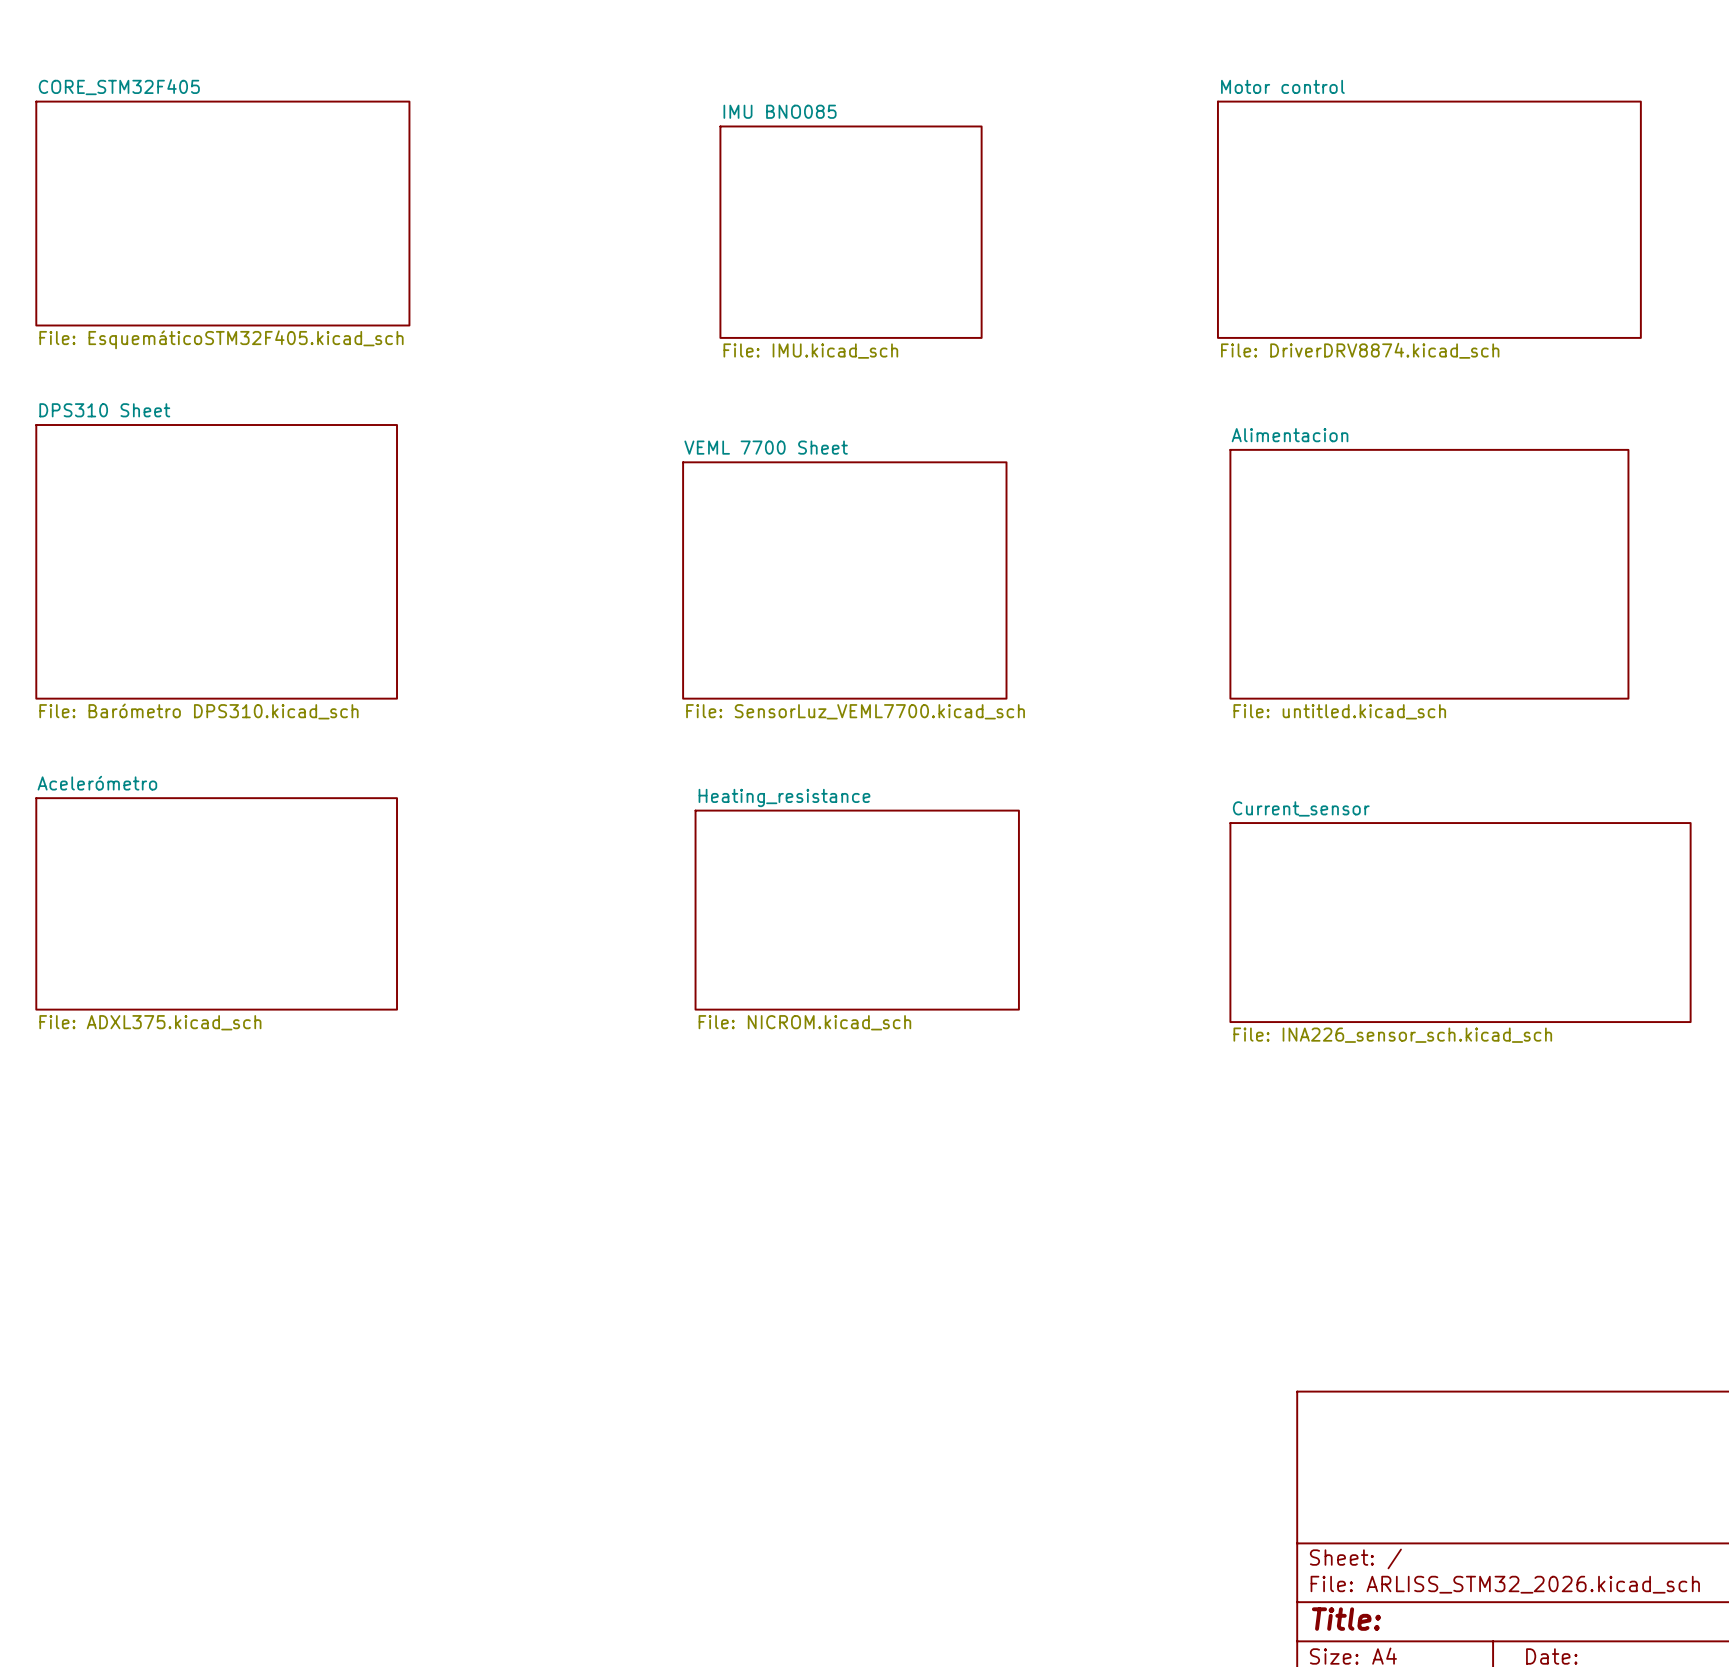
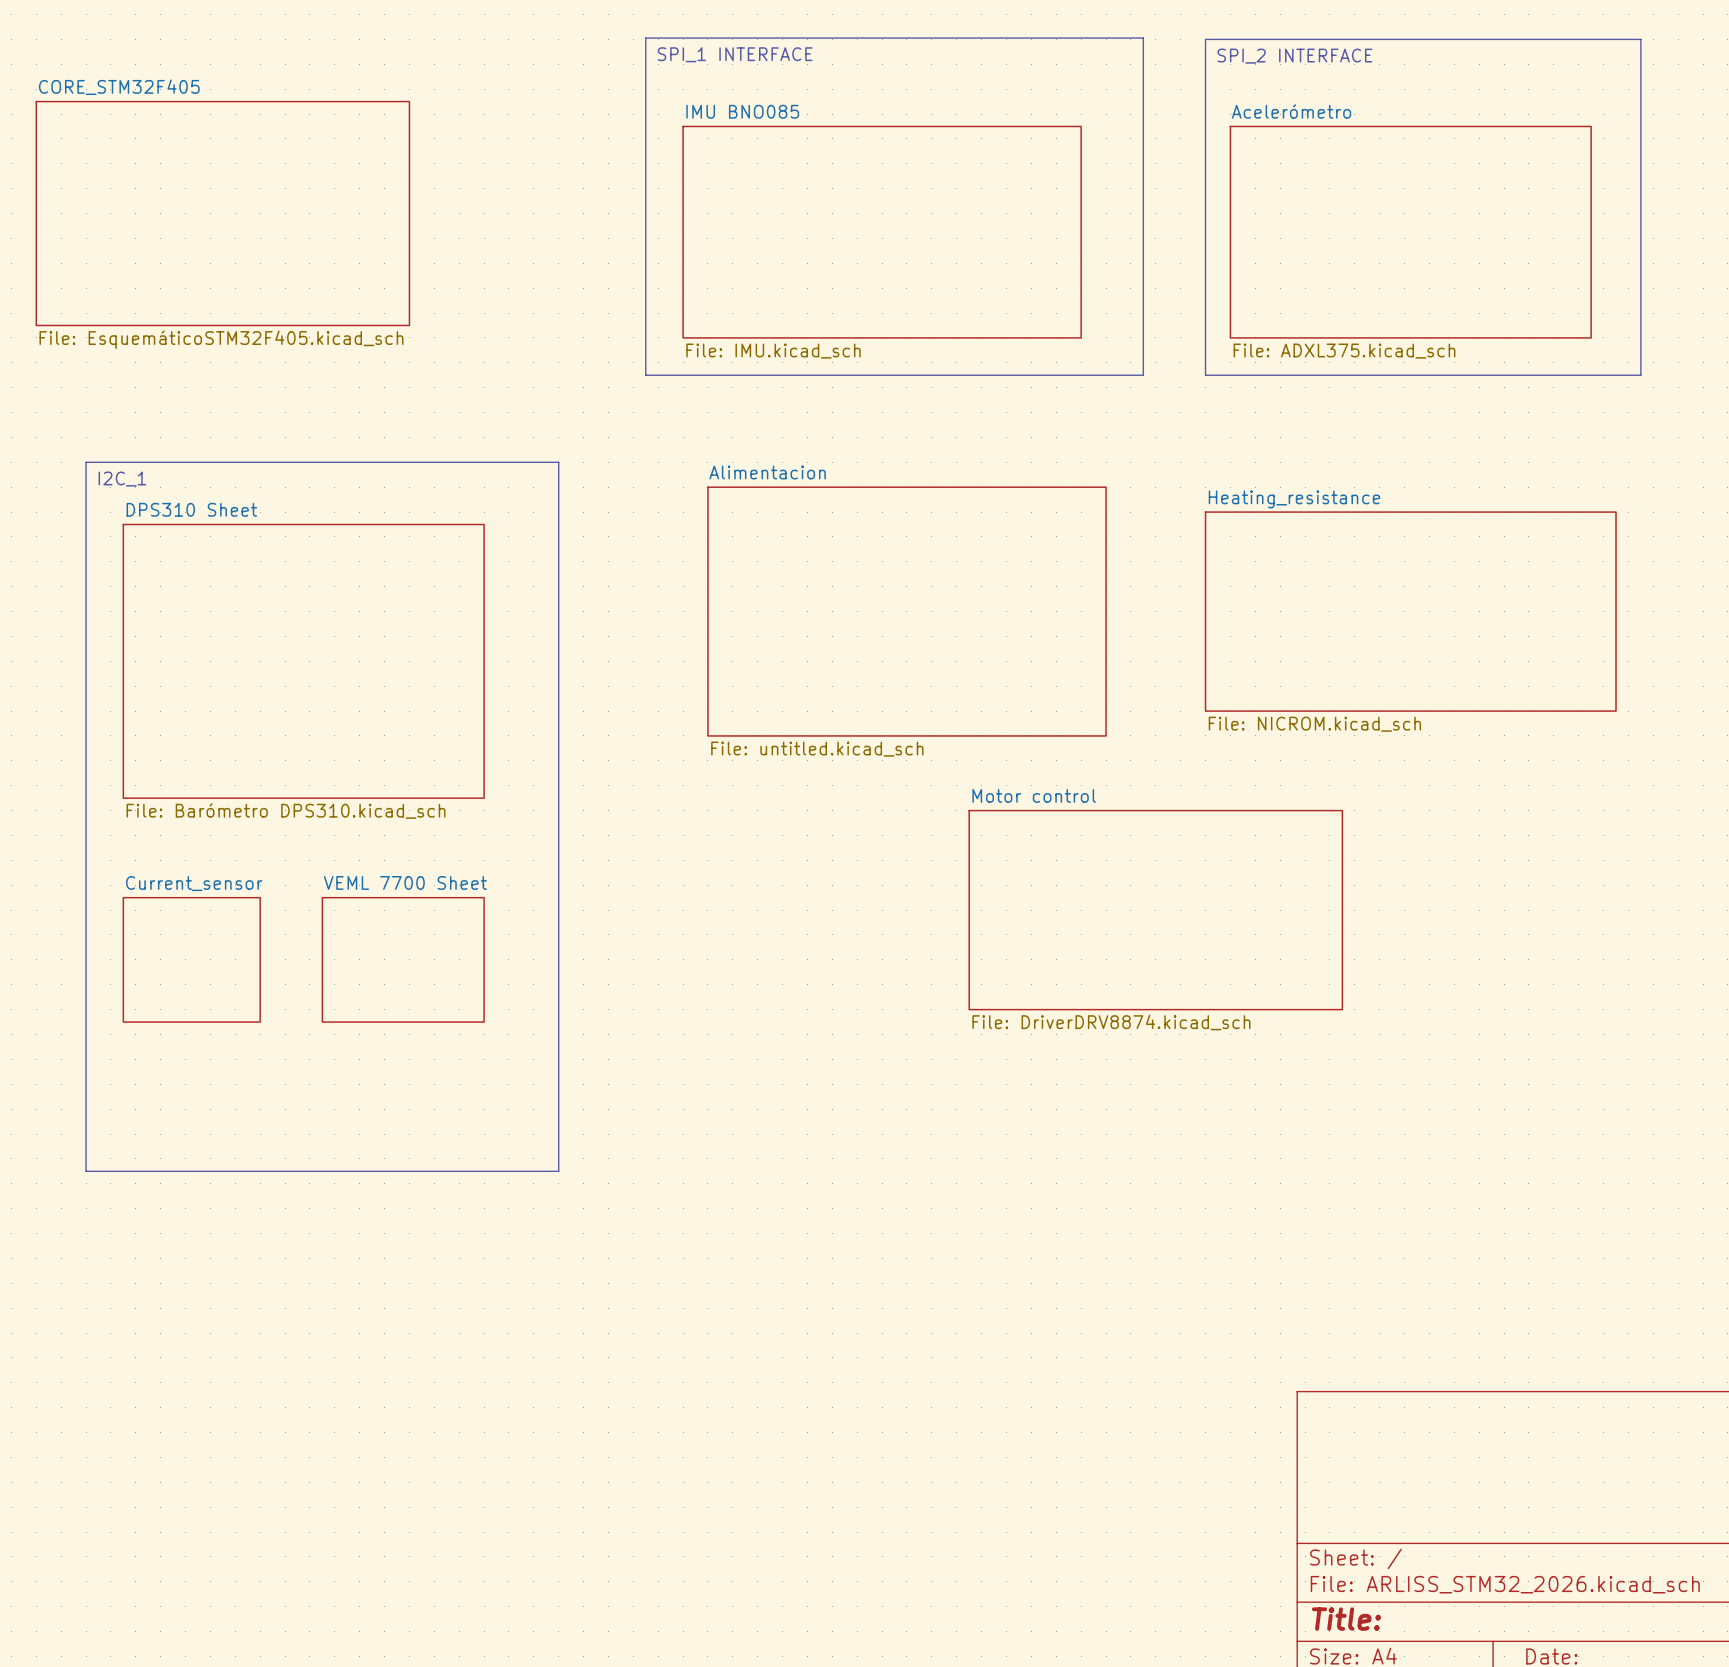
line: none -> (645, 38) (1143, 38) (1143, 375) (645, 375) (645, 38)
line: none -> (1205, 39) (1640, 39) (1640, 375) (1205, 375) (1205, 39)
text: none -> SPI_1 INTERFACE (735, 54)
text: none -> SPI_2 INTERFACE (1294, 56)
sheet IMU BNO085 name position: IMU BNO085 (780, 111) -> IMU BNO085 (742, 111)
sheet IMU BNO085 shape: [719, 125, 983, 339] -> [682, 125, 1082, 339]
sheet Motor control: File: DriverDRV8874.kicad_sch (1429, 219) -> none
sheet Acelerómetro: none -> File: ADXL375.kicad_sch (1410, 232)
sheet IMU BNO085 value position: File: IMU.kicad_sch (810, 351) -> File: IMU.kicad_sch (773, 351)
sheet VEML 7700 Sheet name position: VEML 7700 Sheet (766, 447) -> VEML 7700 Sheet (405, 882)
sheet VEML 7700 Sheet shape: [682, 461, 1008, 700] -> [321, 896, 485, 1023]
line: none -> (86, 462) (558, 462) (558, 1171) (86, 1171) (86, 462)
text: none -> I2C_1 (122, 479)
sheet DPS310 Sheet position: (216, 561) -> (303, 661)
sheet Alimentacion: File: untitled.kicad_sch (1429, 574) -> none
sheet Alimentacion: none -> File: untitled.kicad_sch (906, 611)
sheet Heating_resistance: none -> File: NICROM.kicad_sch (1410, 611)
sheet VEML 7700 Sheet value: File: SensorLuz_VEML7700.kicad_sch (855, 711) -> none
sheet Acelerómetro: File: ADXL375.kicad_sch (216, 903) -> none
sheet Heating_resistance: File: NICROM.kicad_sch (857, 910) -> none
sheet Motor control: none -> File: DriverDRV8874.kicad_sch (1155, 910)
sheet Current_sensor: File: INA226_sensor_sch.kicad_sch (1460, 922) -> none
sheet Current_sensor: none -> (191, 959)

